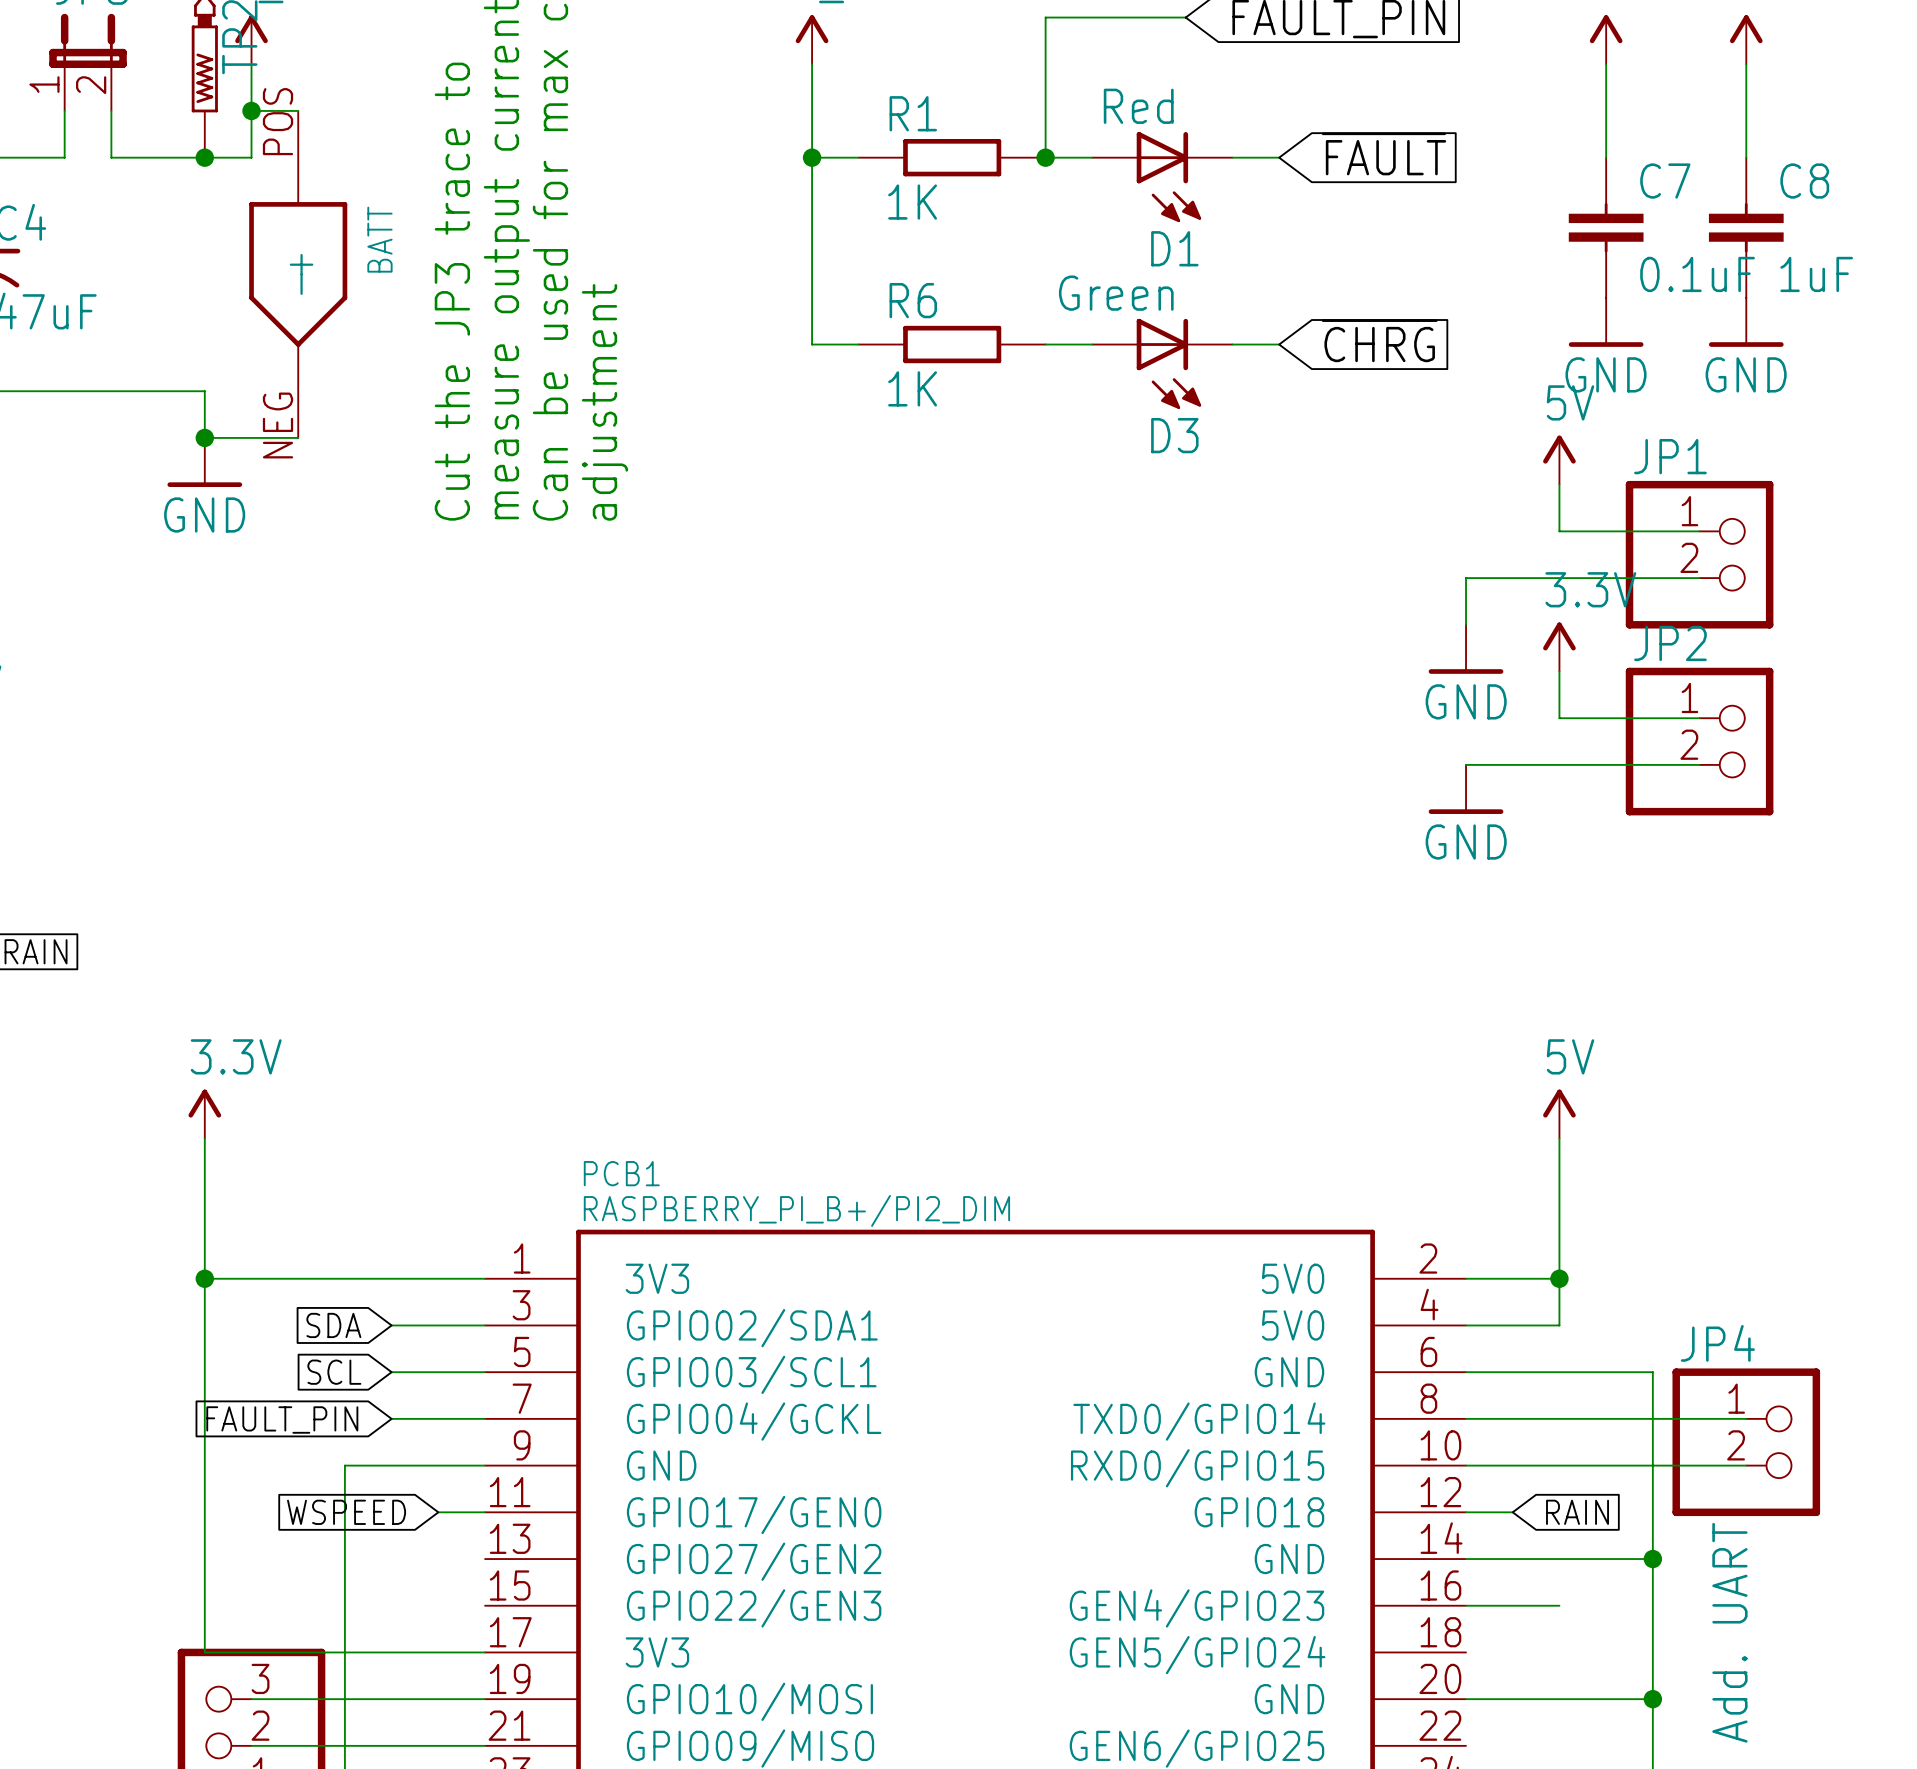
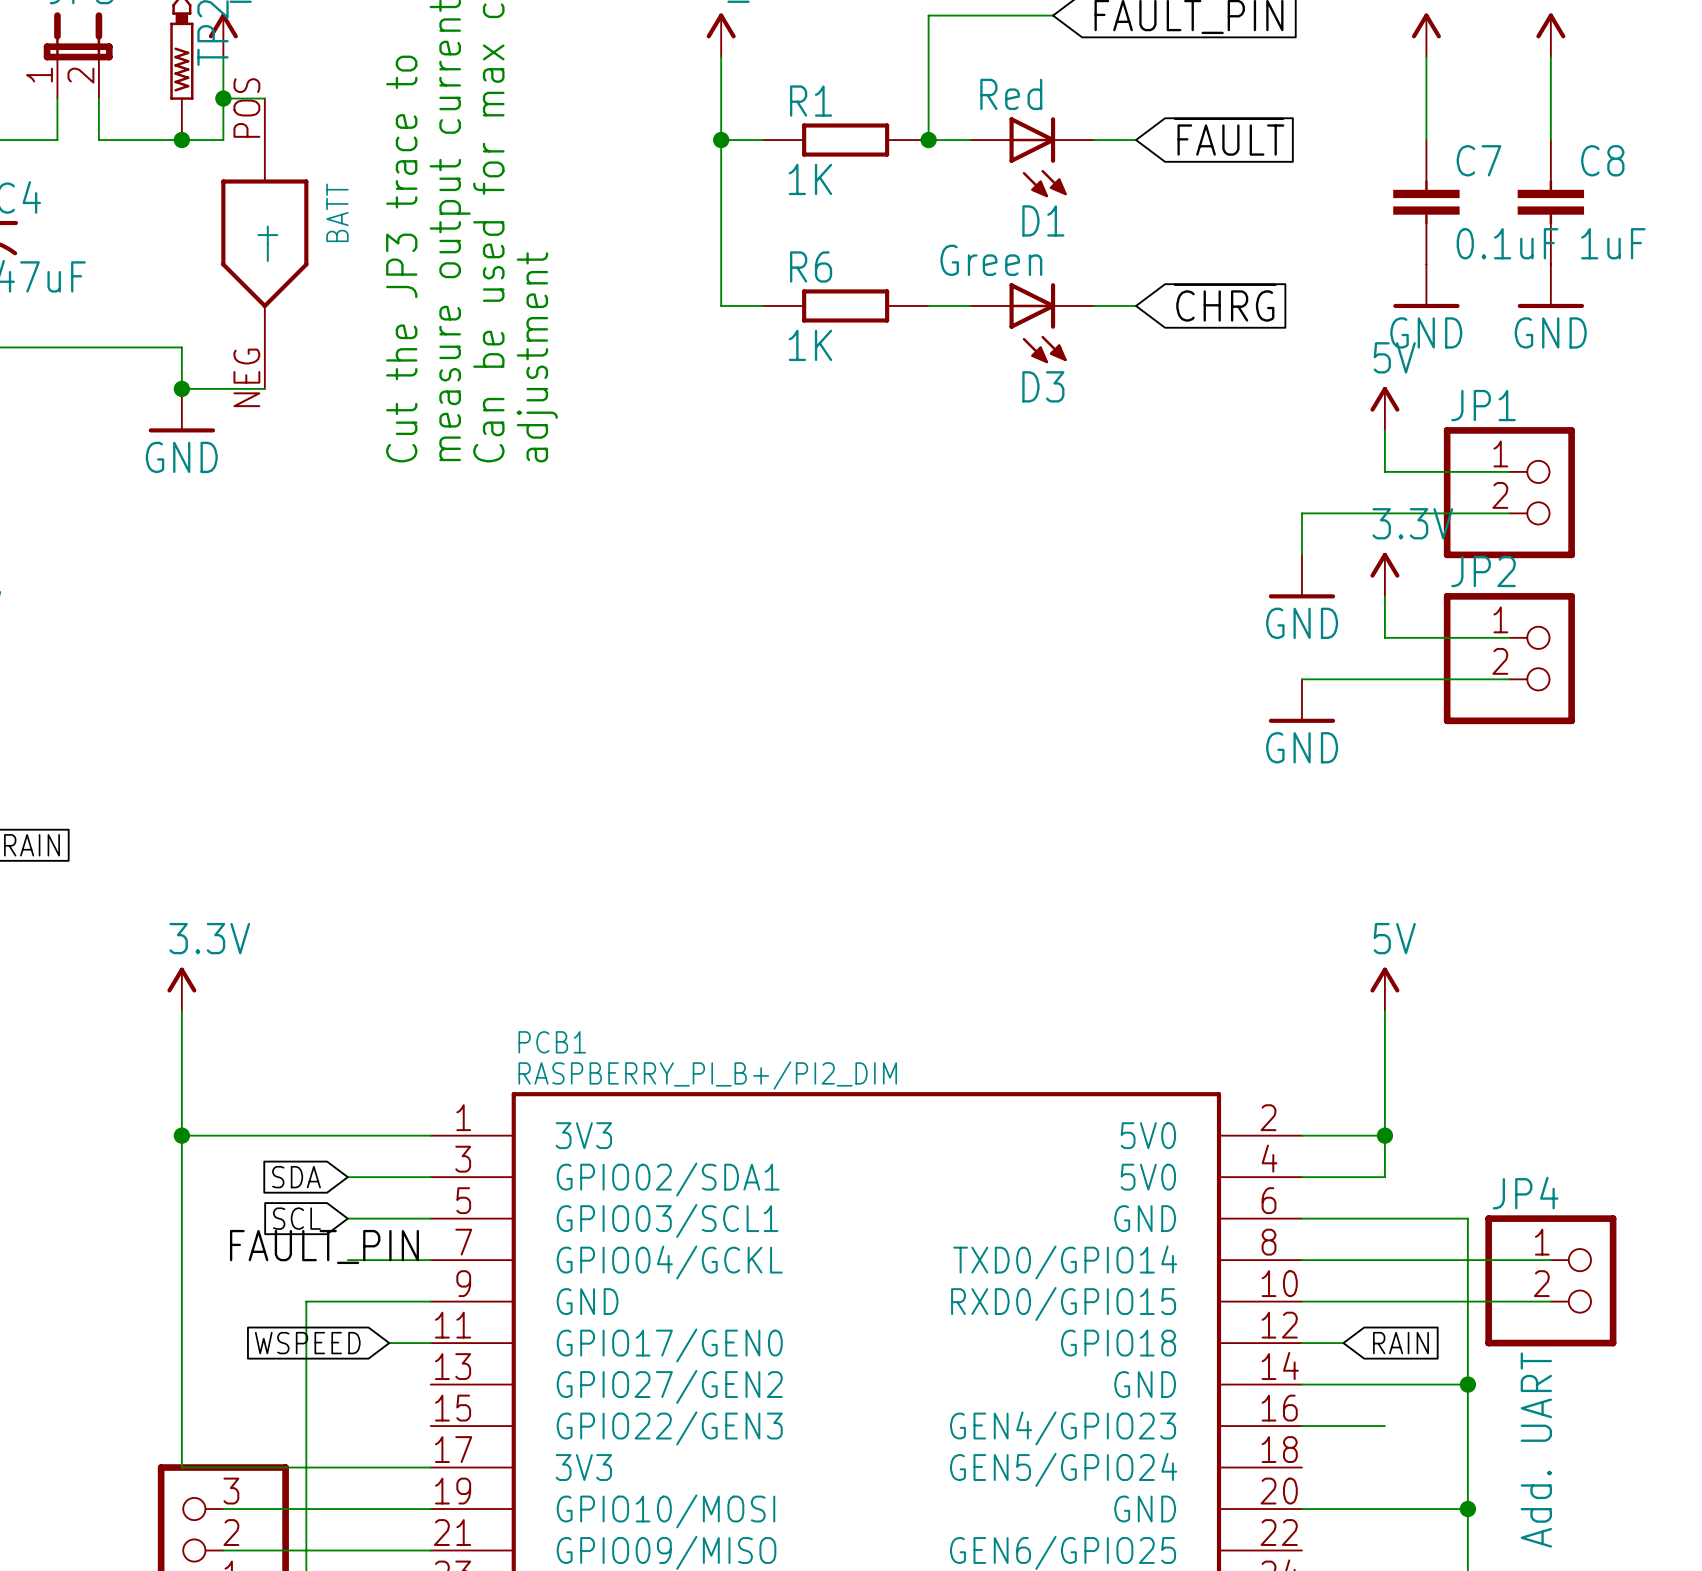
label: none -> FAULT_PIN (324, 1246)
global label: FAULT_PIN (282, 1420) -> none

